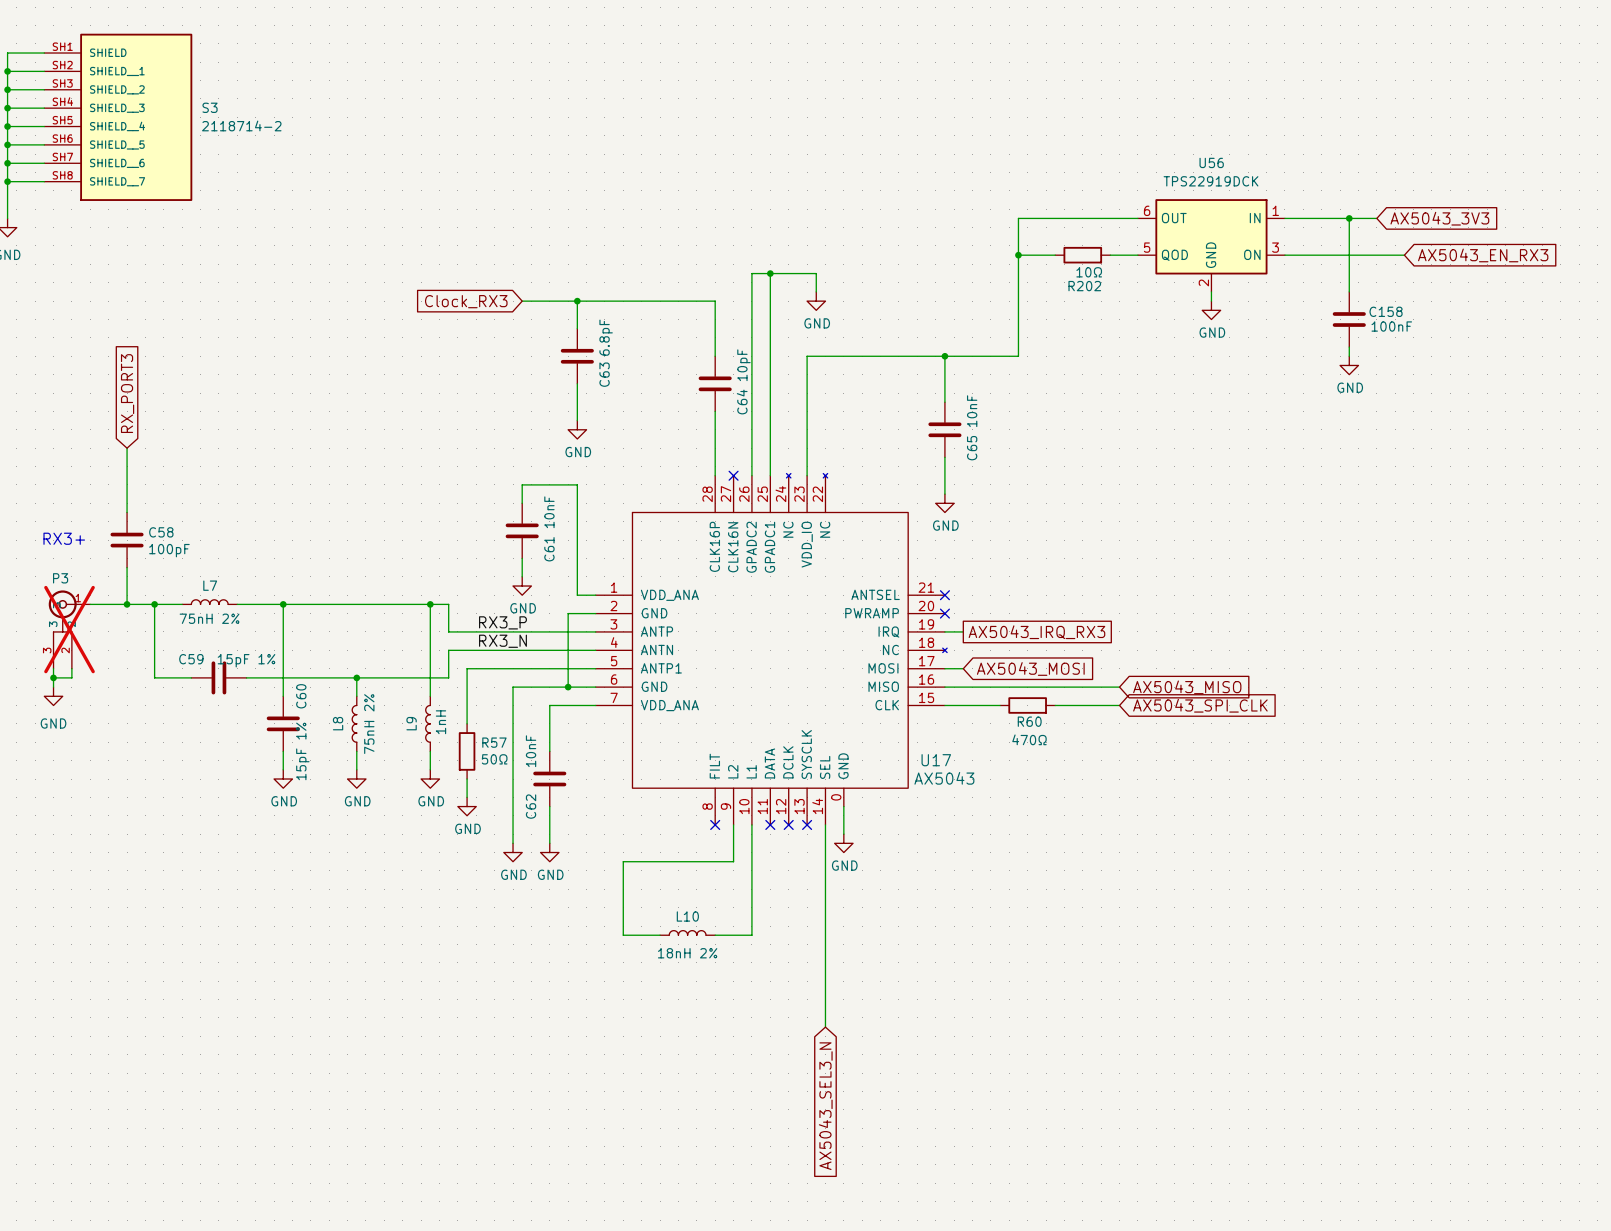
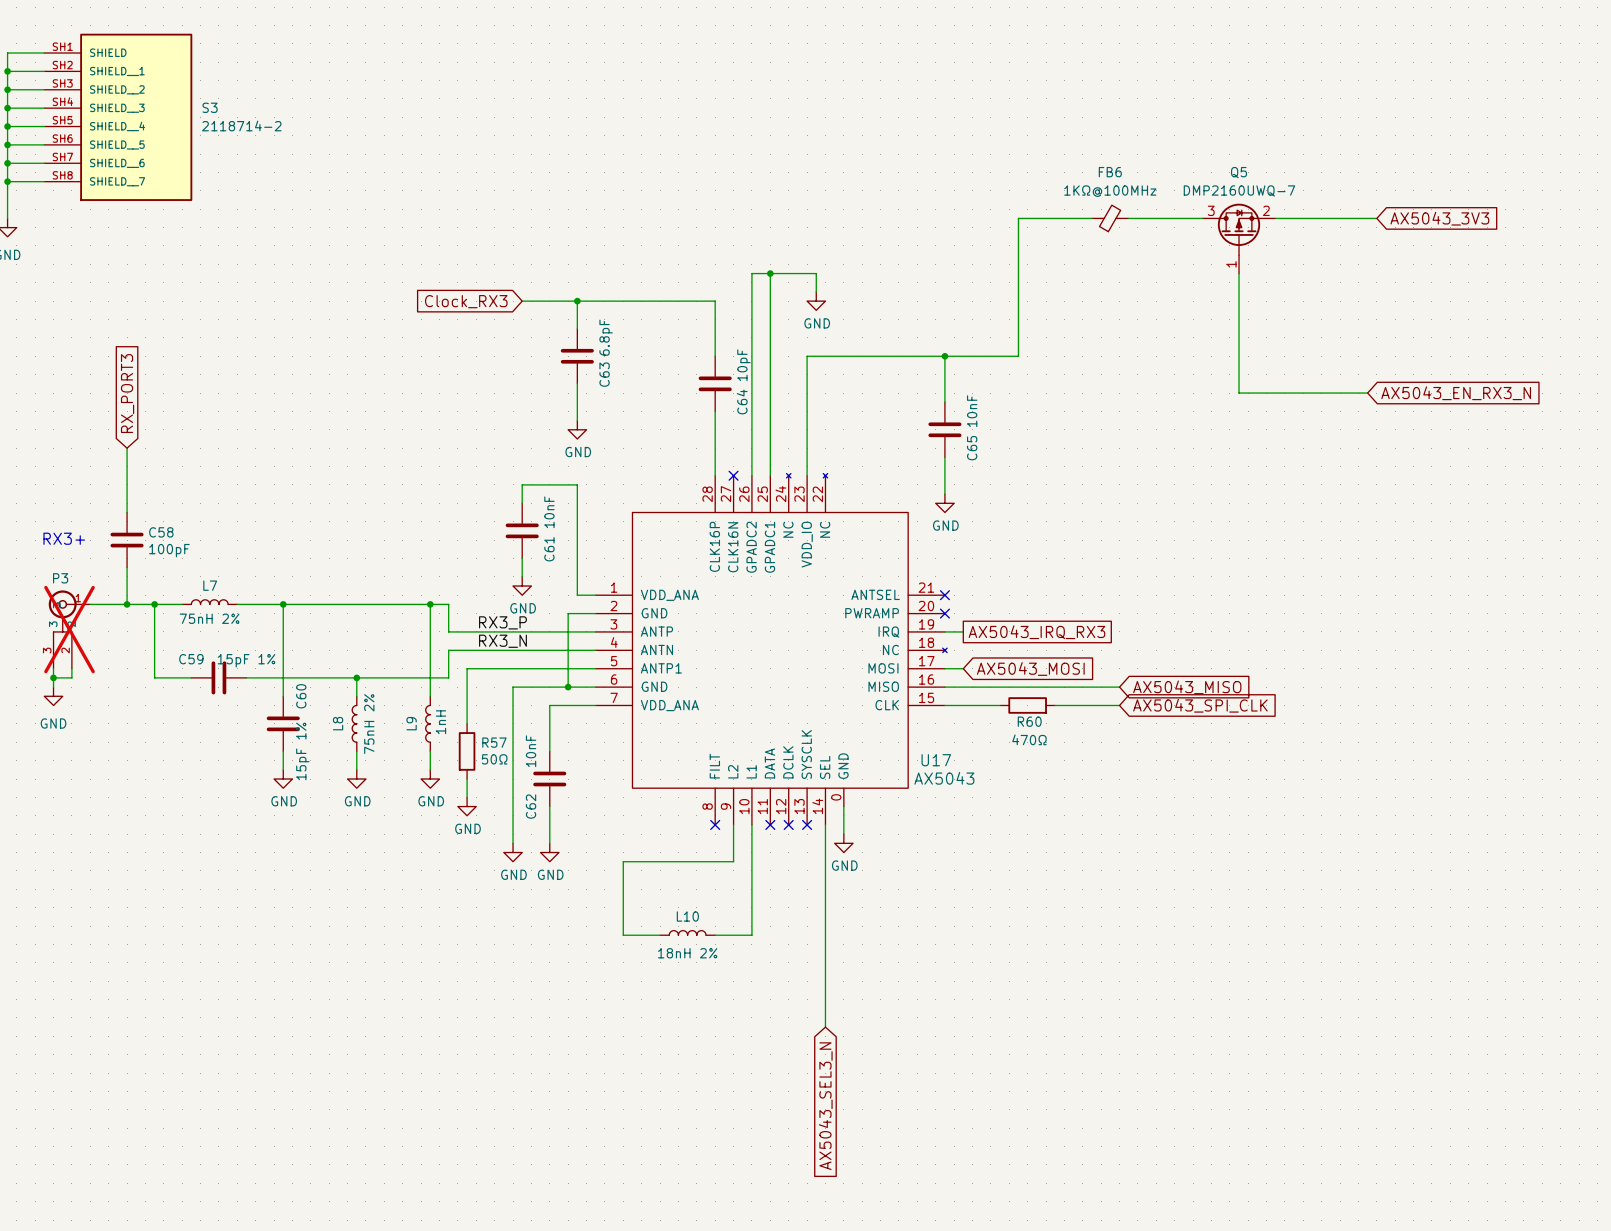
FB6: none -> 1KΩ@100MHz (1110, 218)
wire: (1349, 218) (1349, 291) -> none
junction: (1349, 218) -> none
Q5: none -> DMP2160UWQ-7 (1239, 238)
U56: TPS22919DCK (1211, 245) -> none
wire: (1018, 255) (1055, 255) -> none
junction: (1018, 255) -> none
R202: 10Ω (1082, 255) -> none
wire: (1110, 255) (1137, 255) -> none
wire: (1284, 255) (1404, 255) -> none
global label: AX5043_EN_RX3 (1483, 255) -> none
wire: none -> (1239, 273) (1239, 393) (1367, 393)
wire: (1211, 291) (1211, 301) -> none
power symbol: GND (1211, 310) -> none
C158: 100nF (1349, 319) -> none
wire: (1349, 347) (1349, 356) -> none
power symbol: GND (1349, 365) -> none
global label: none -> AX5043_EN_RX3_N (1456, 393)

